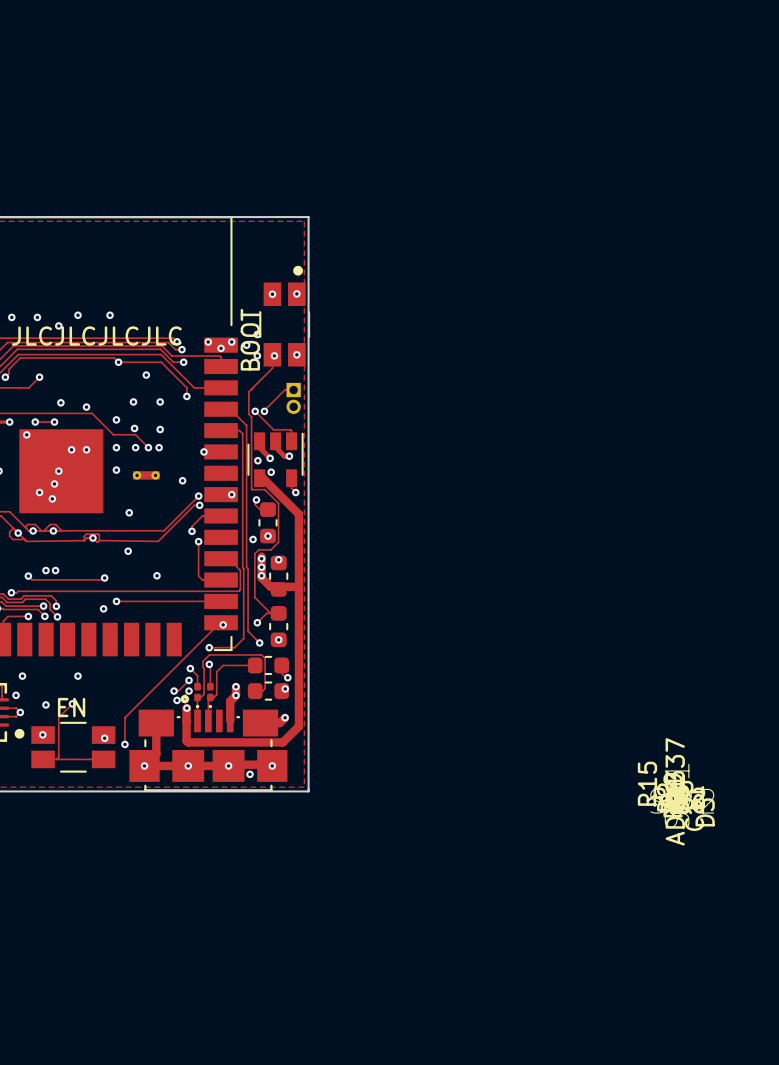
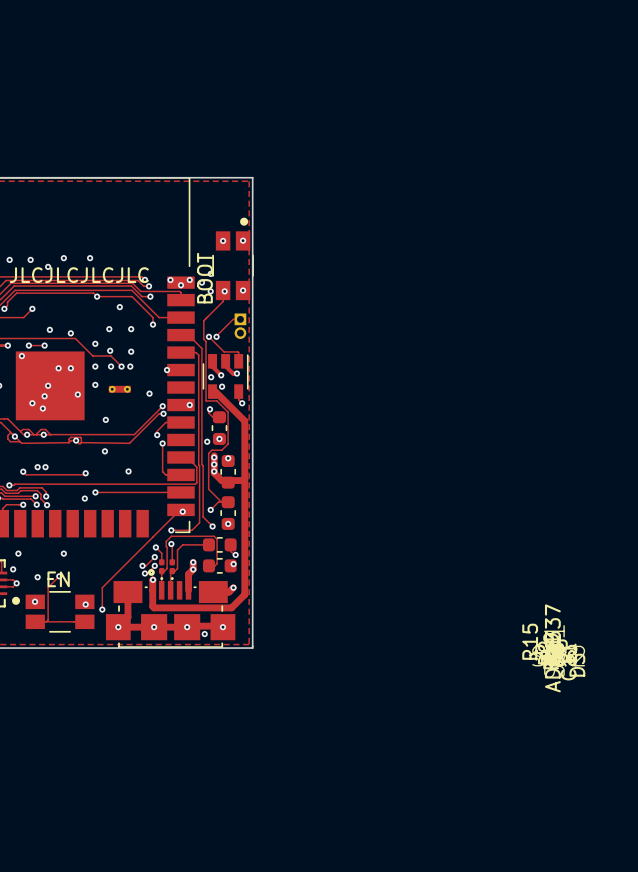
via: none -> (77, 394)

